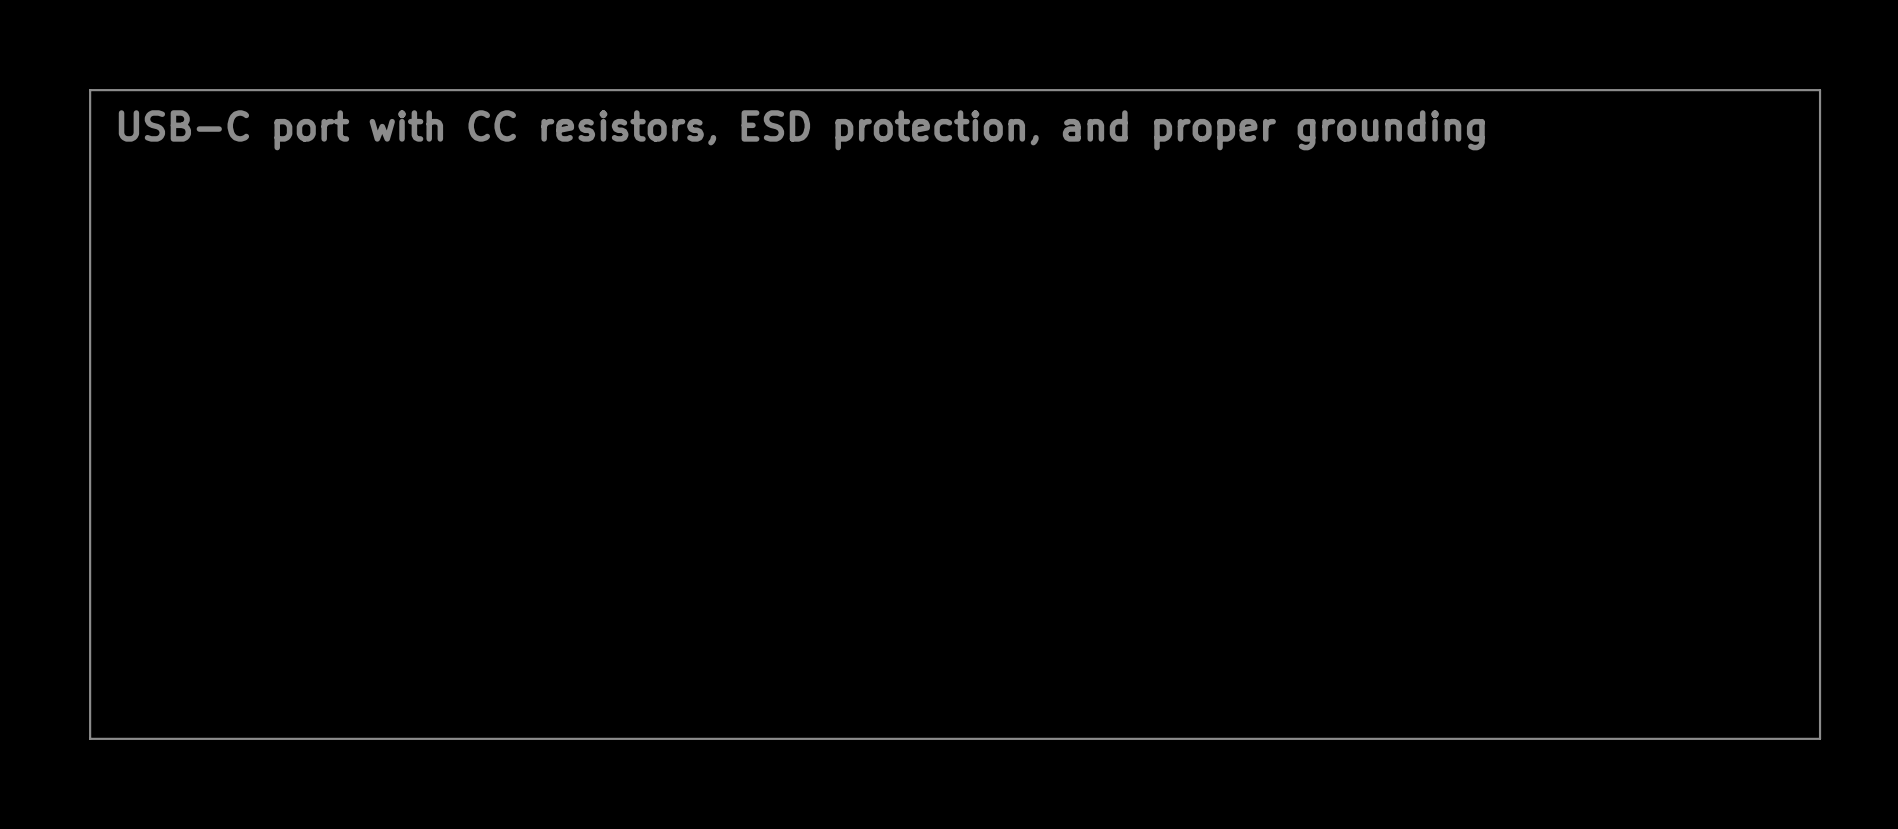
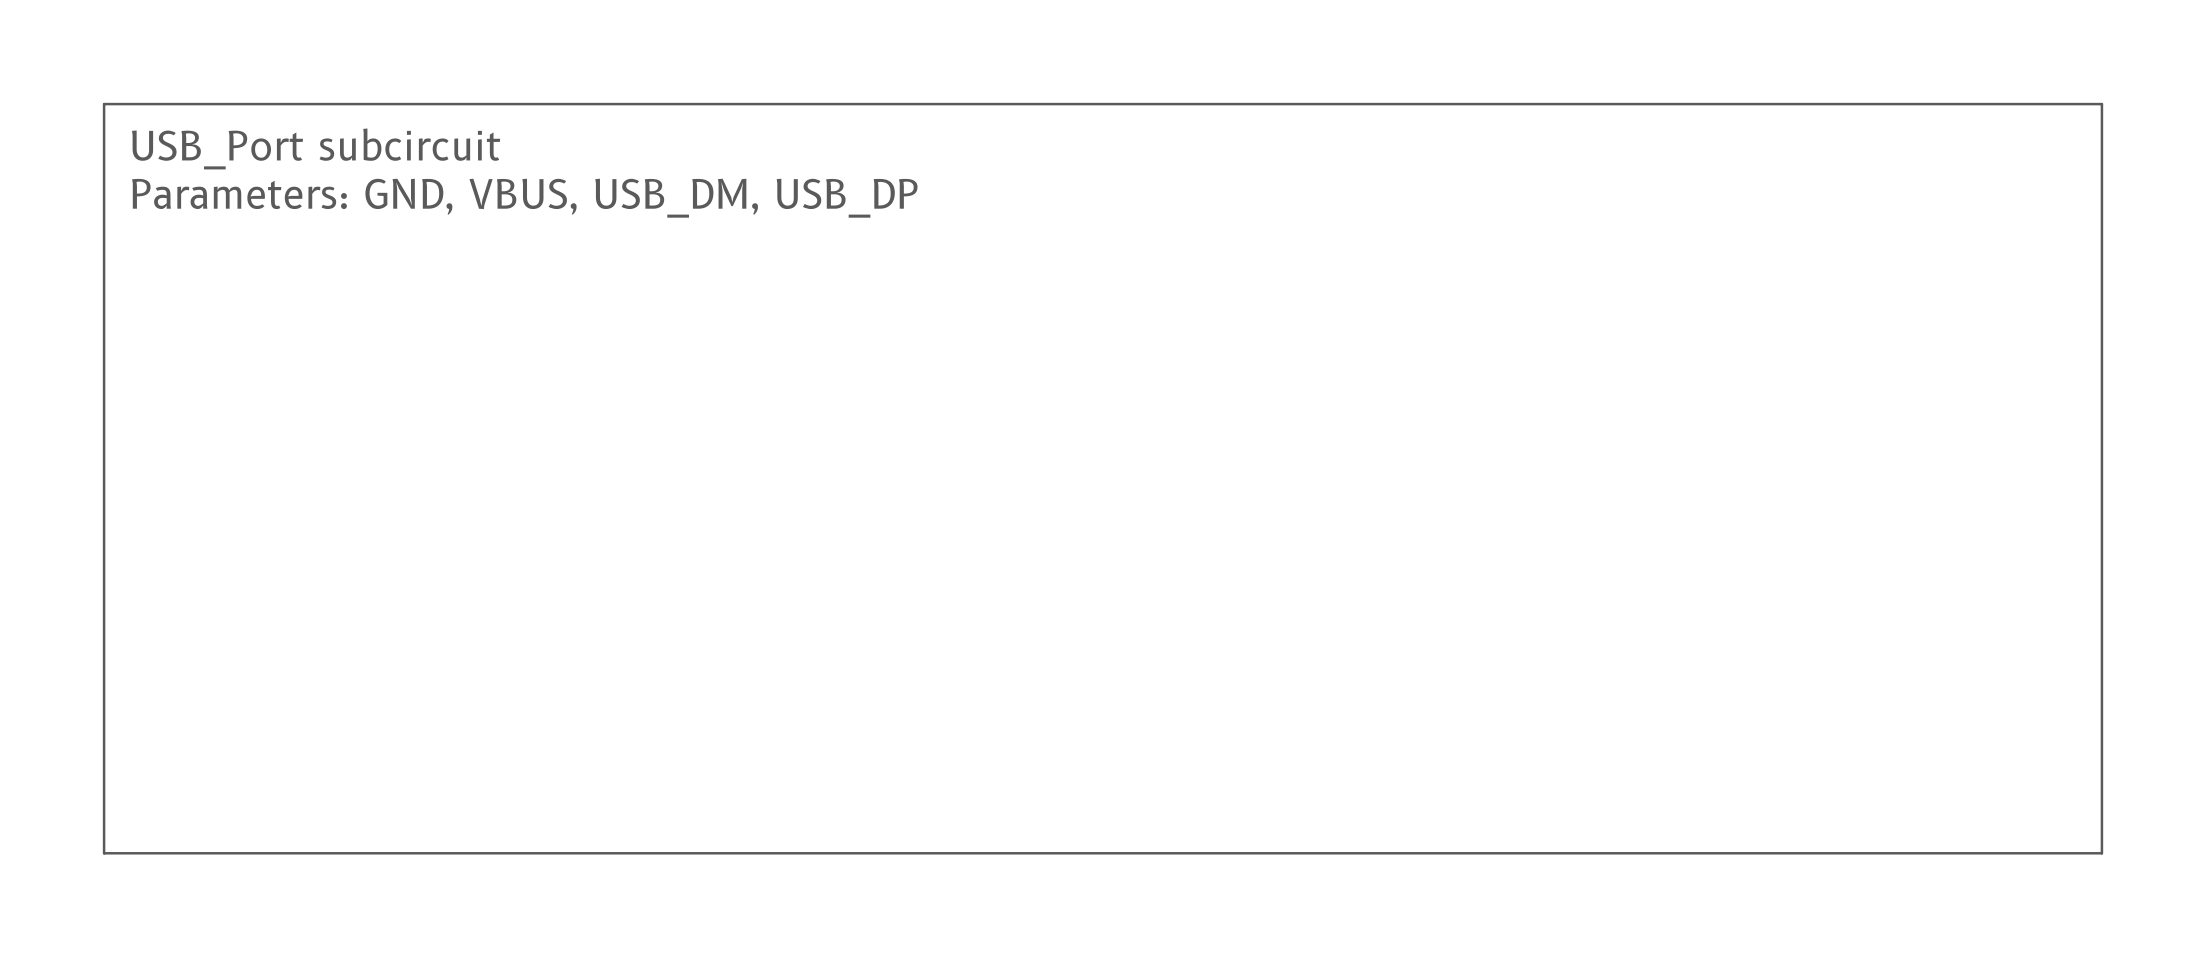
text: USB-C port with CC resistors, ESD protection, and proper grounding (801, 130) -> USB_Port subcircuit (316, 148)
text: none -> Parameters: GND, VBUS, USB_DM, USB_DP (524, 198)

